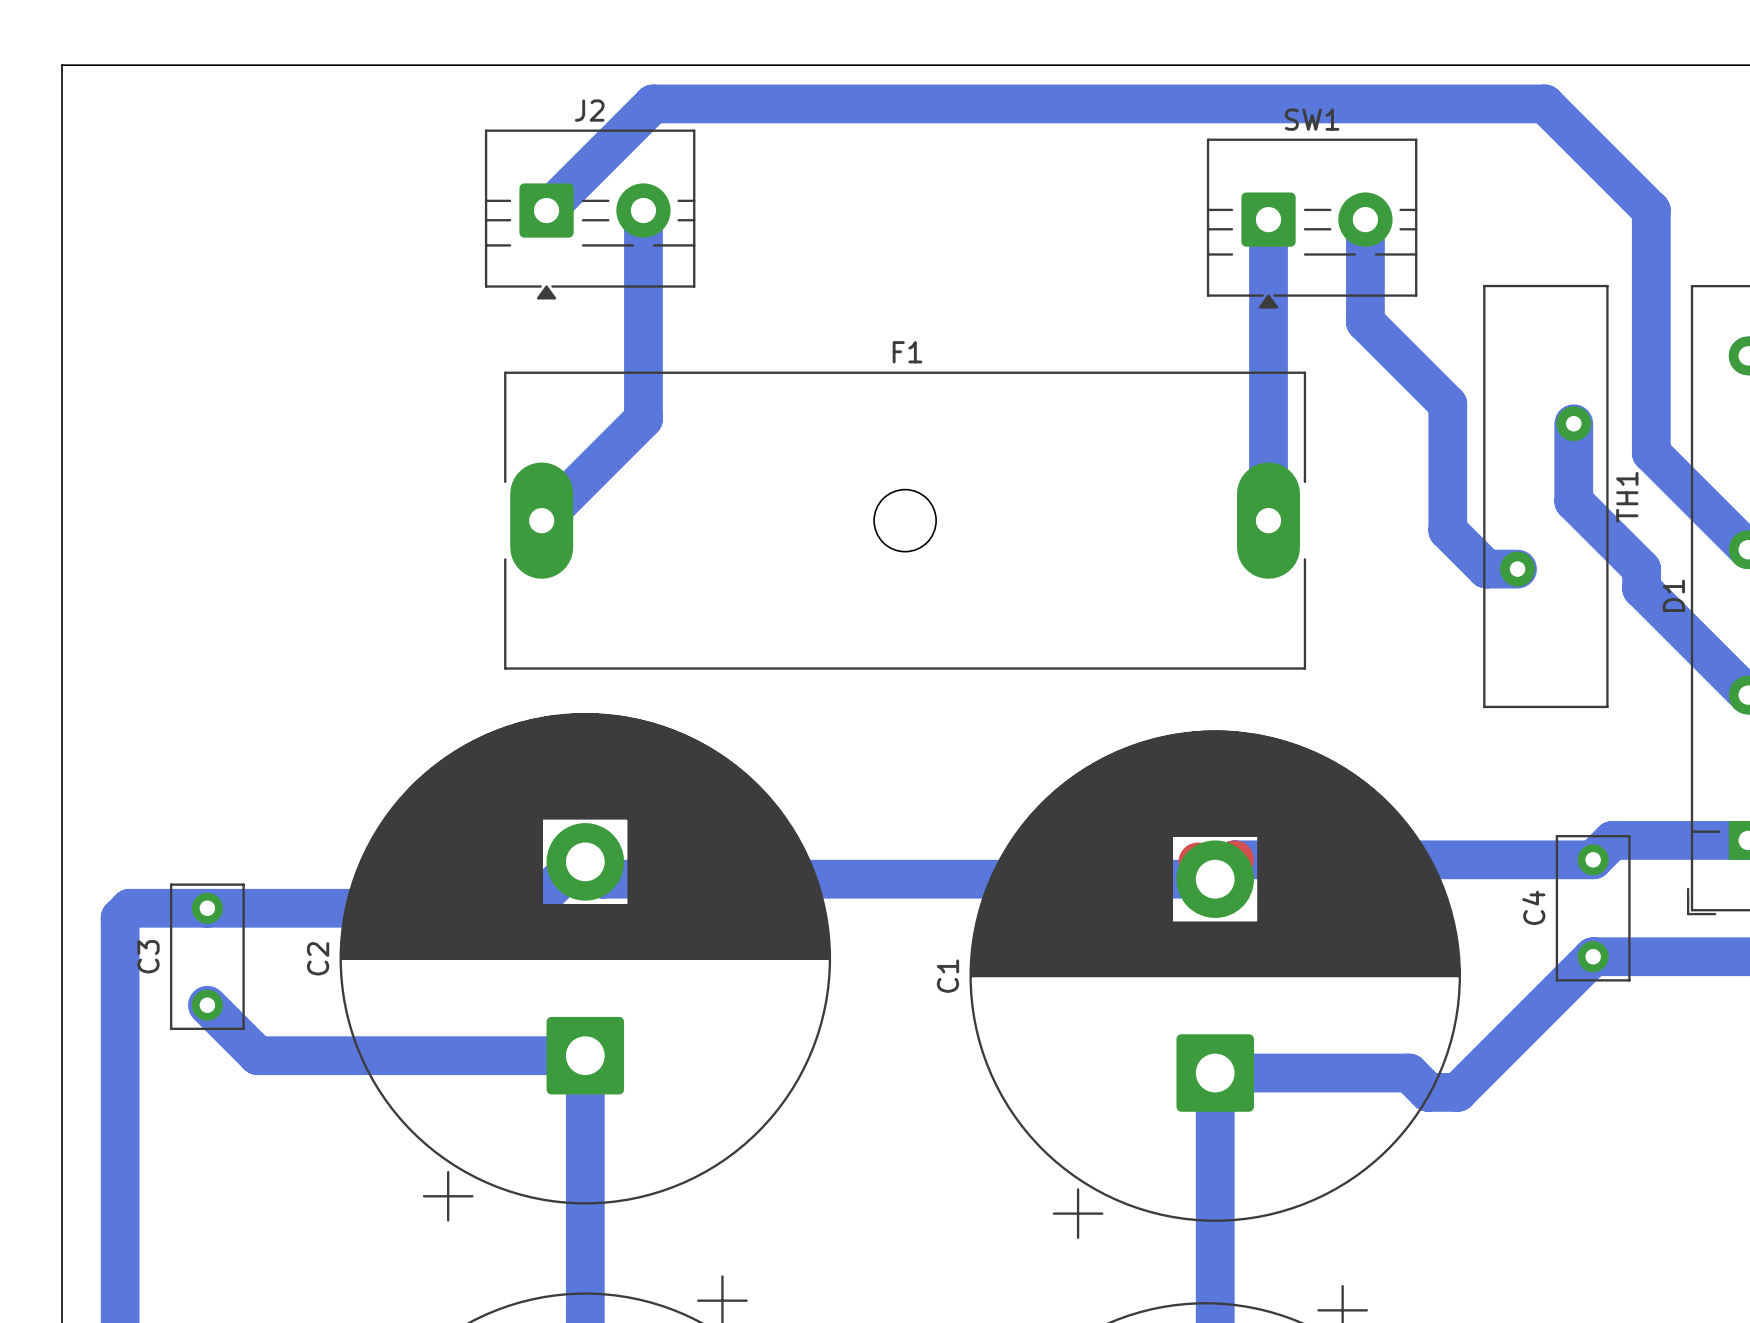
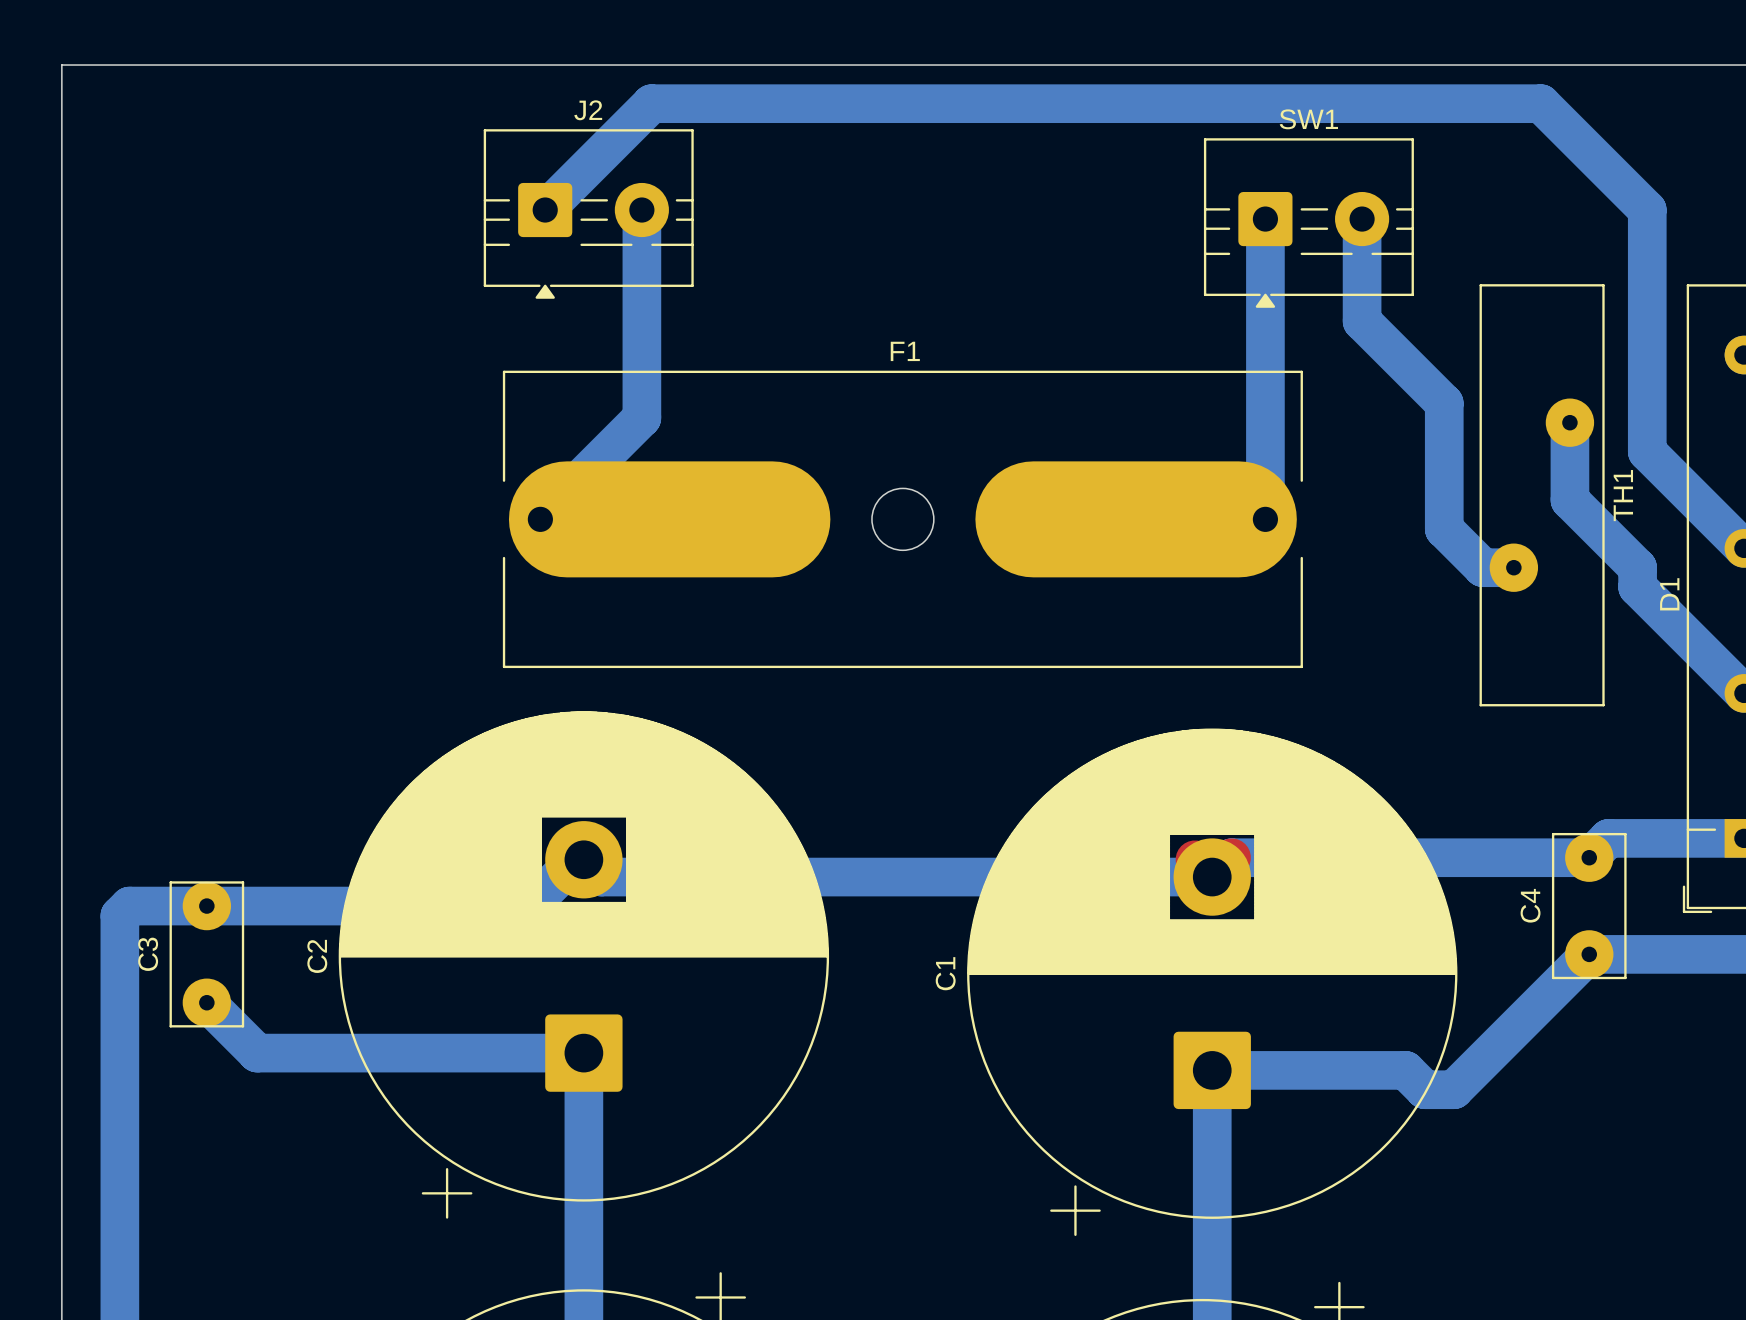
TH1 footprint: [1483, 284, 1609, 709] -> [1479, 284, 1605, 707]
F1 footprint: [504, 371, 1307, 670] -> [502, 370, 1303, 669]
C4 footprint: [1555, 835, 1631, 982] -> [1551, 832, 1627, 980]
C3 footprint: [169, 883, 245, 1030] -> [169, 881, 245, 1028]

